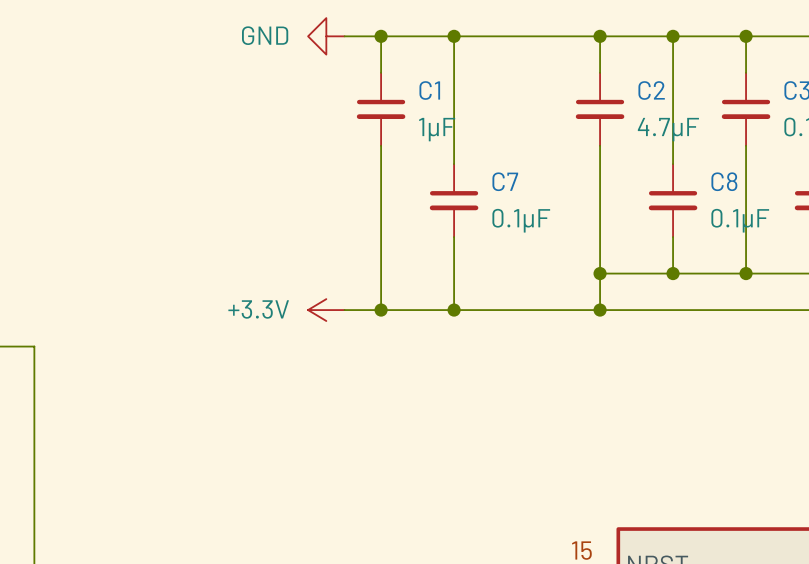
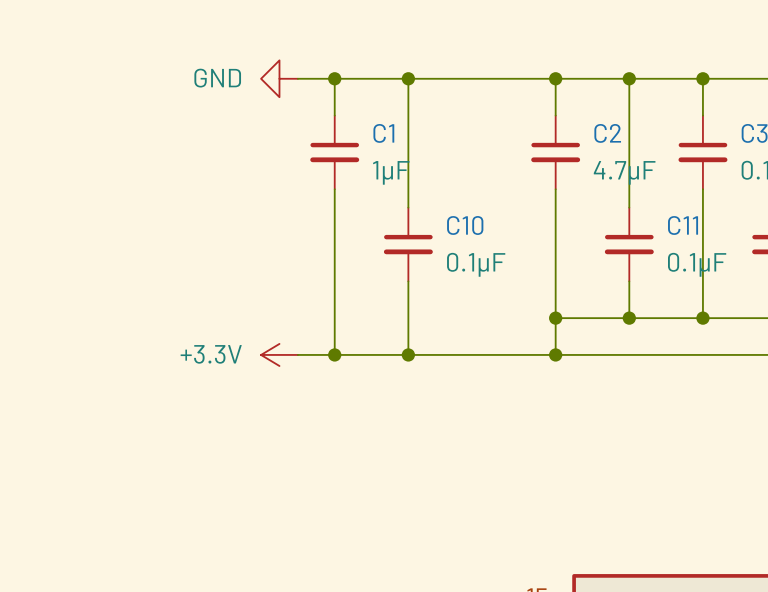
C7 name: C7 (505, 181) -> C10 (465, 225)
C8 name: C8 (724, 181) -> C11 (683, 225)

